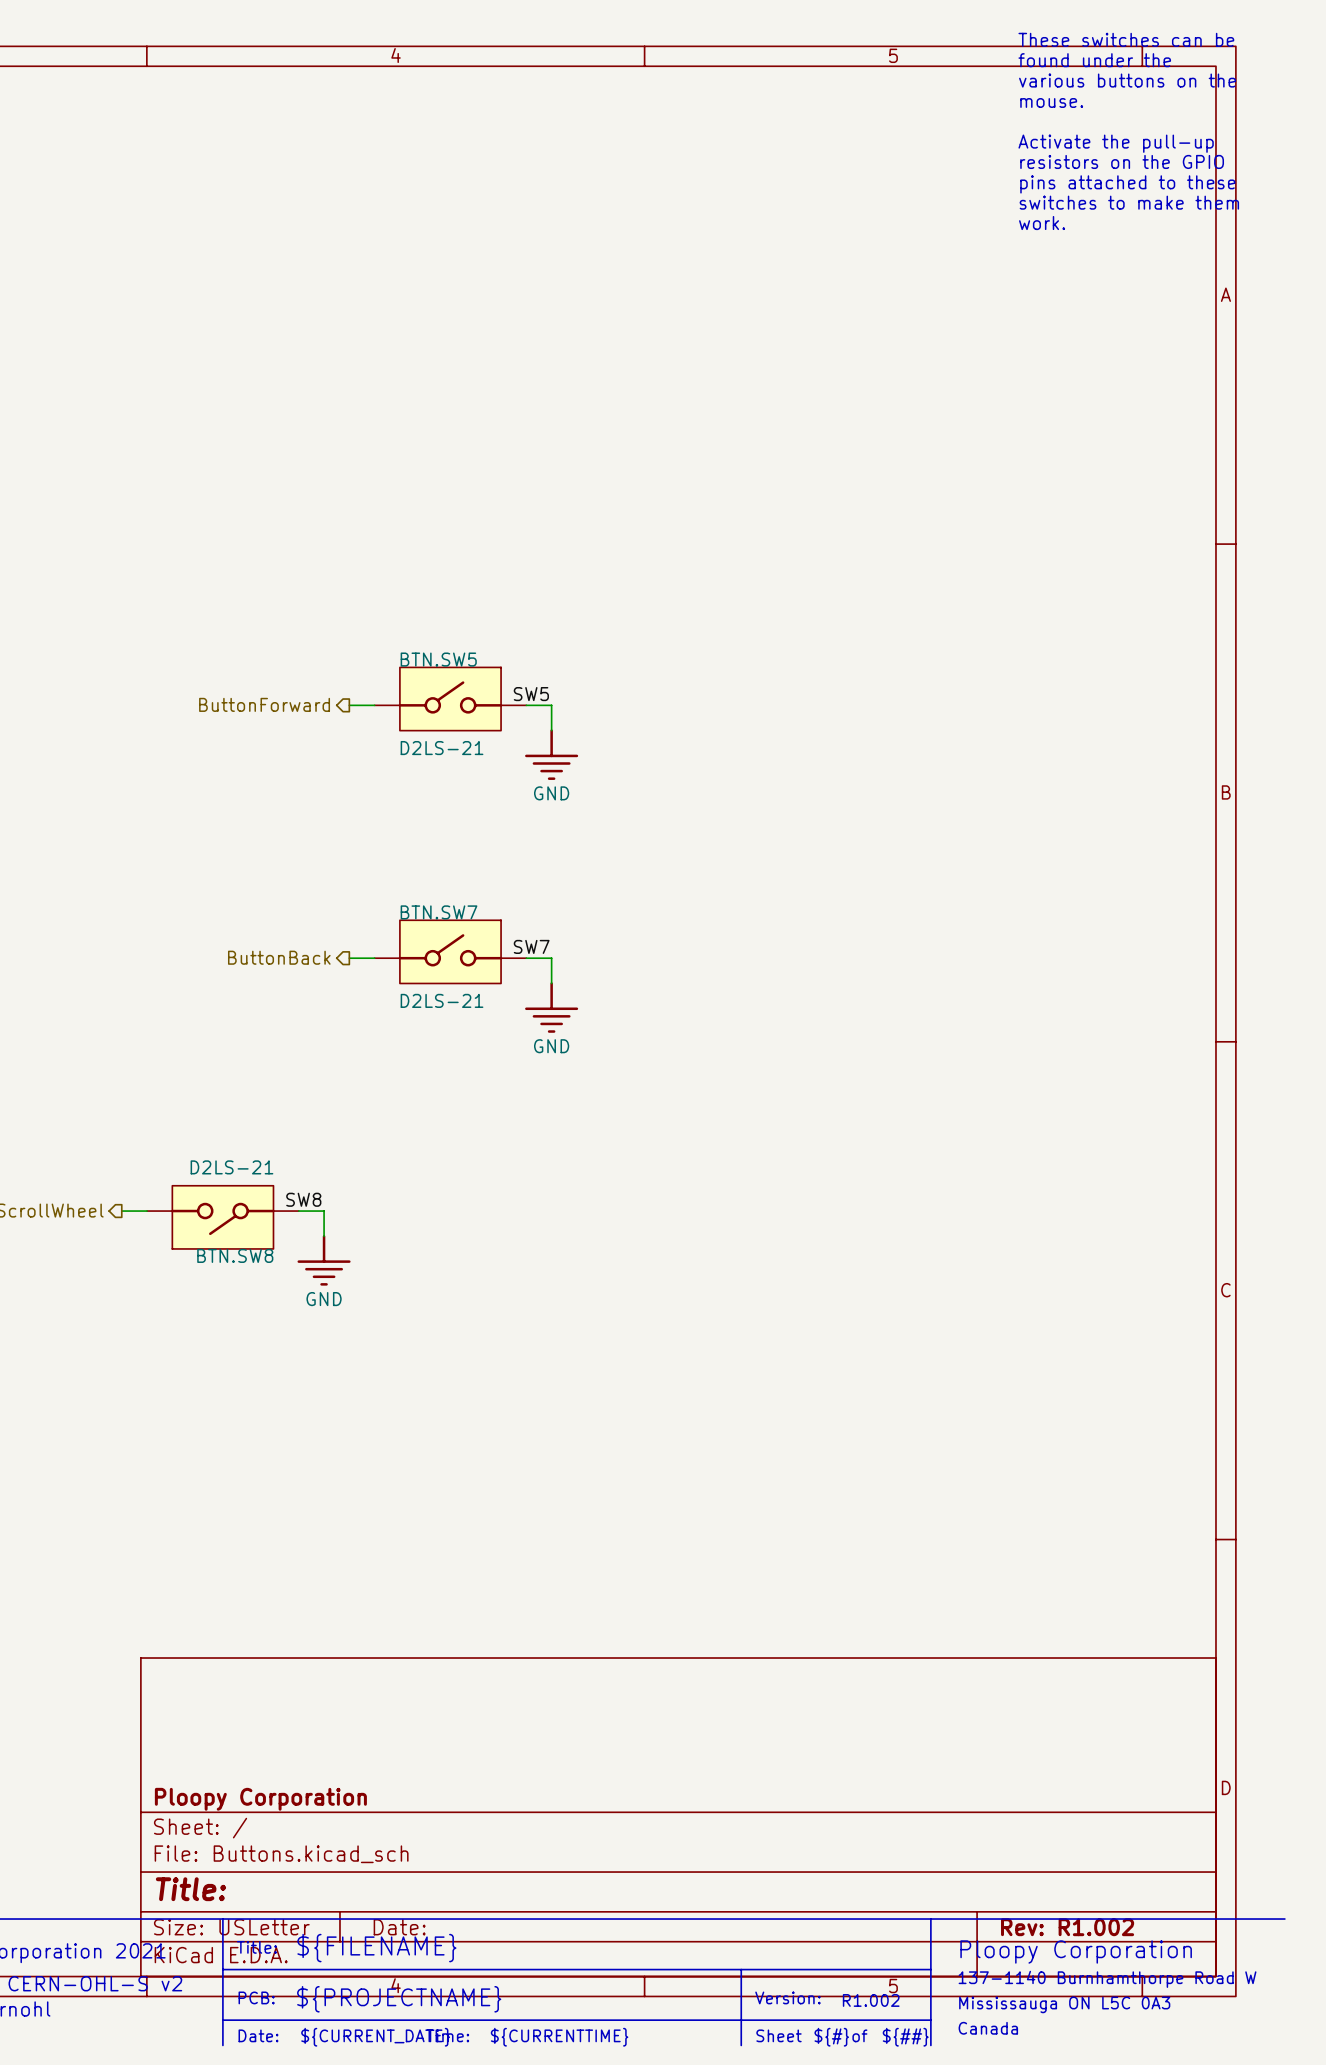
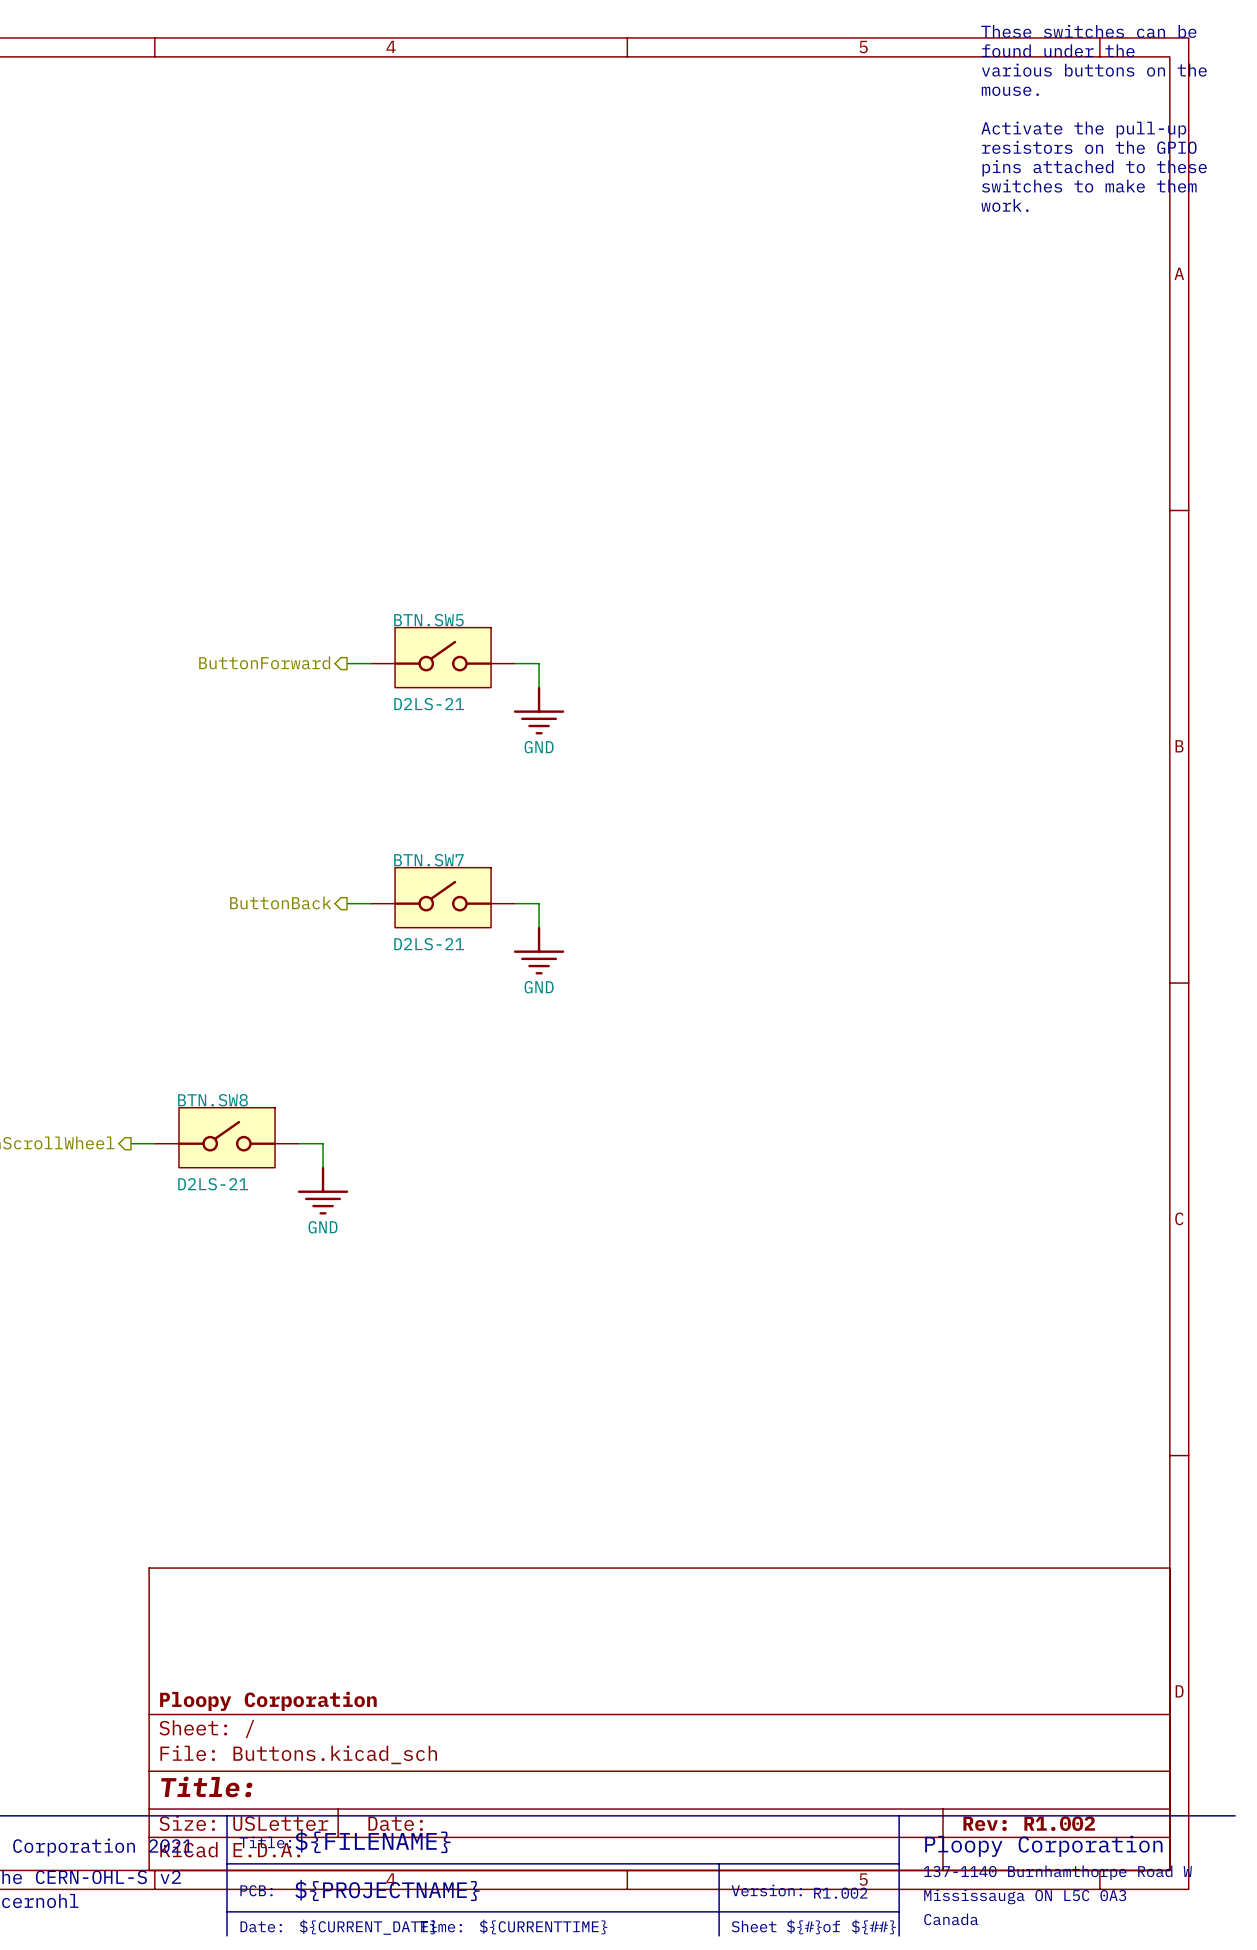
label: SW5 (531, 694) -> none
label: SW7 (531, 946) -> none
label: SW8 (303, 1199) -> none
BTN.SW8 rotation: 0° (222, 1217) -> 180° (227, 1137)

